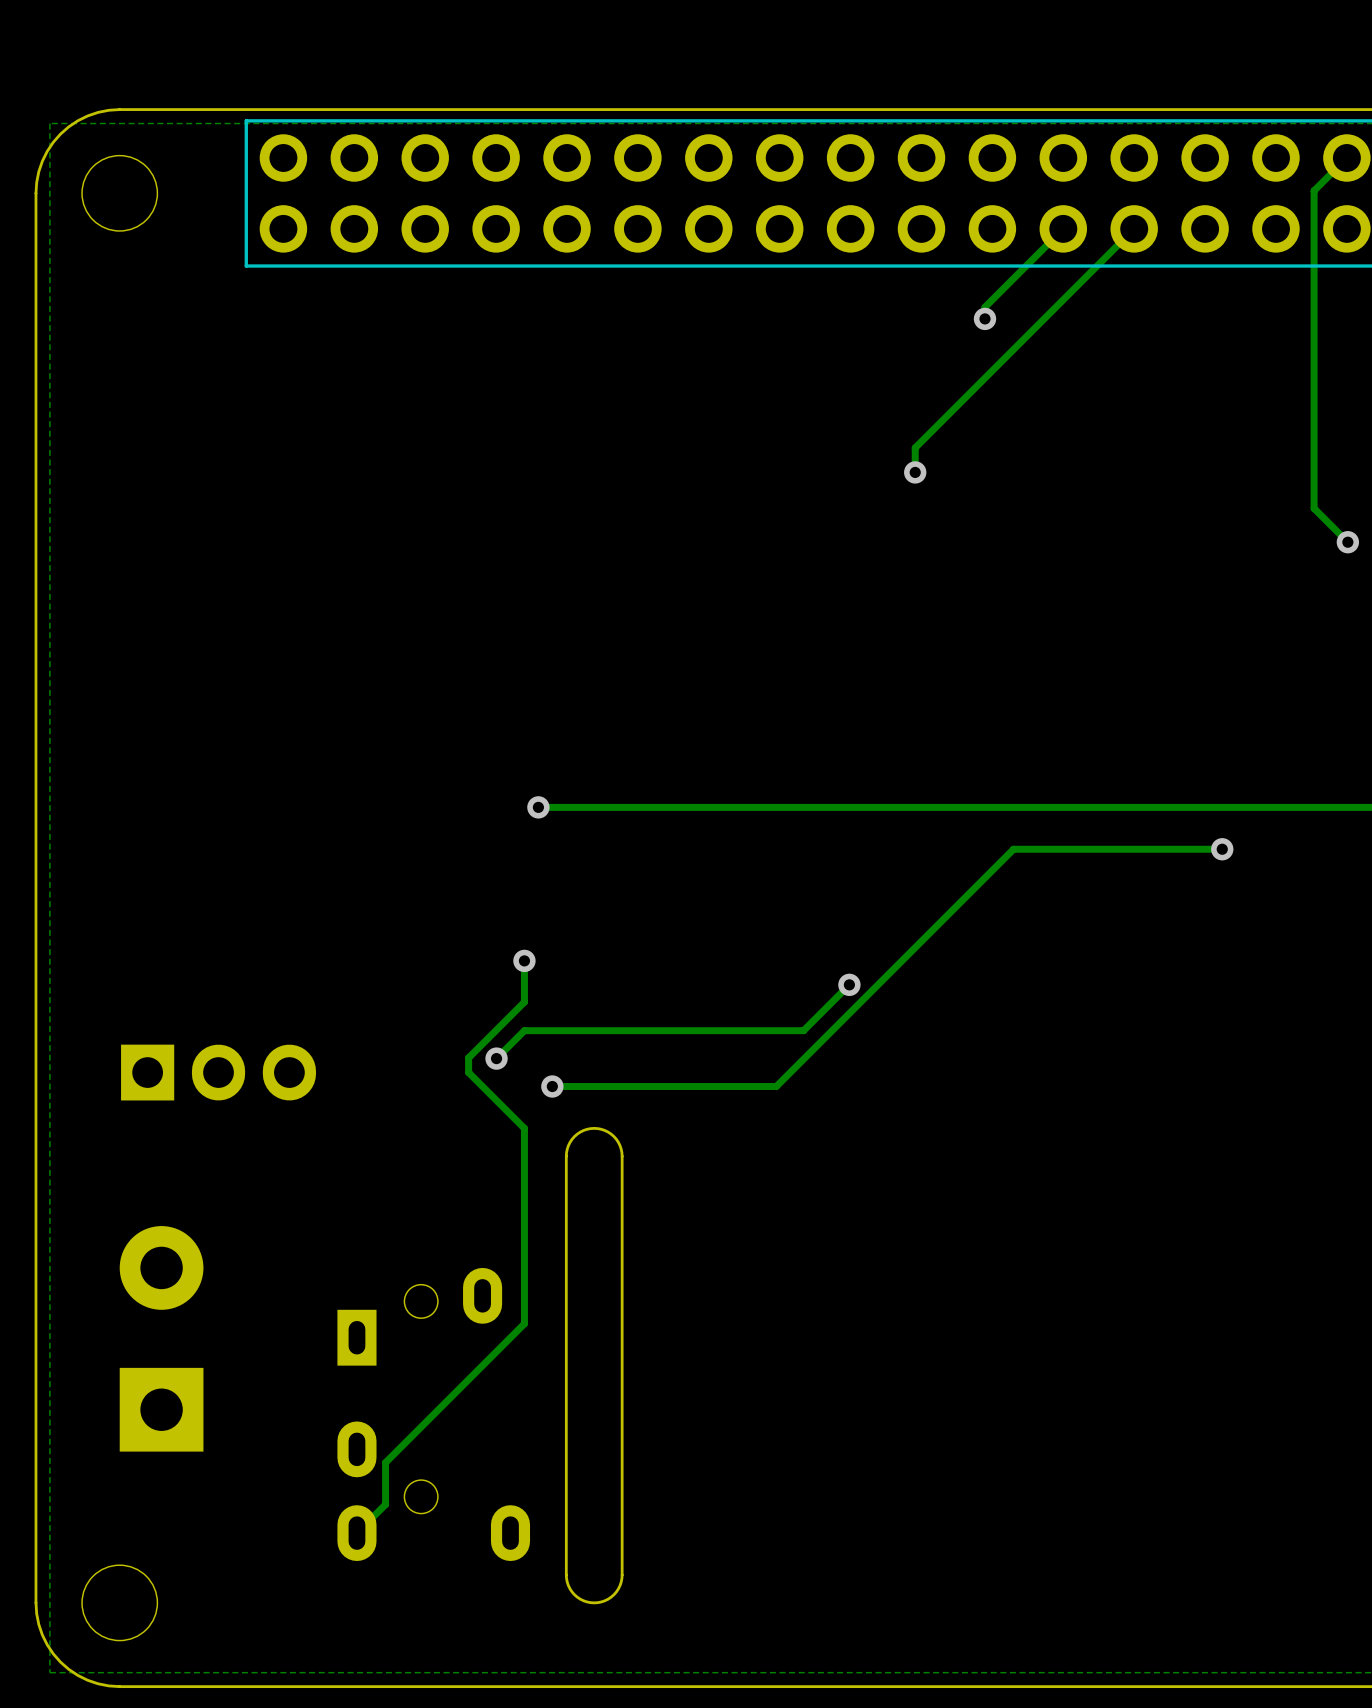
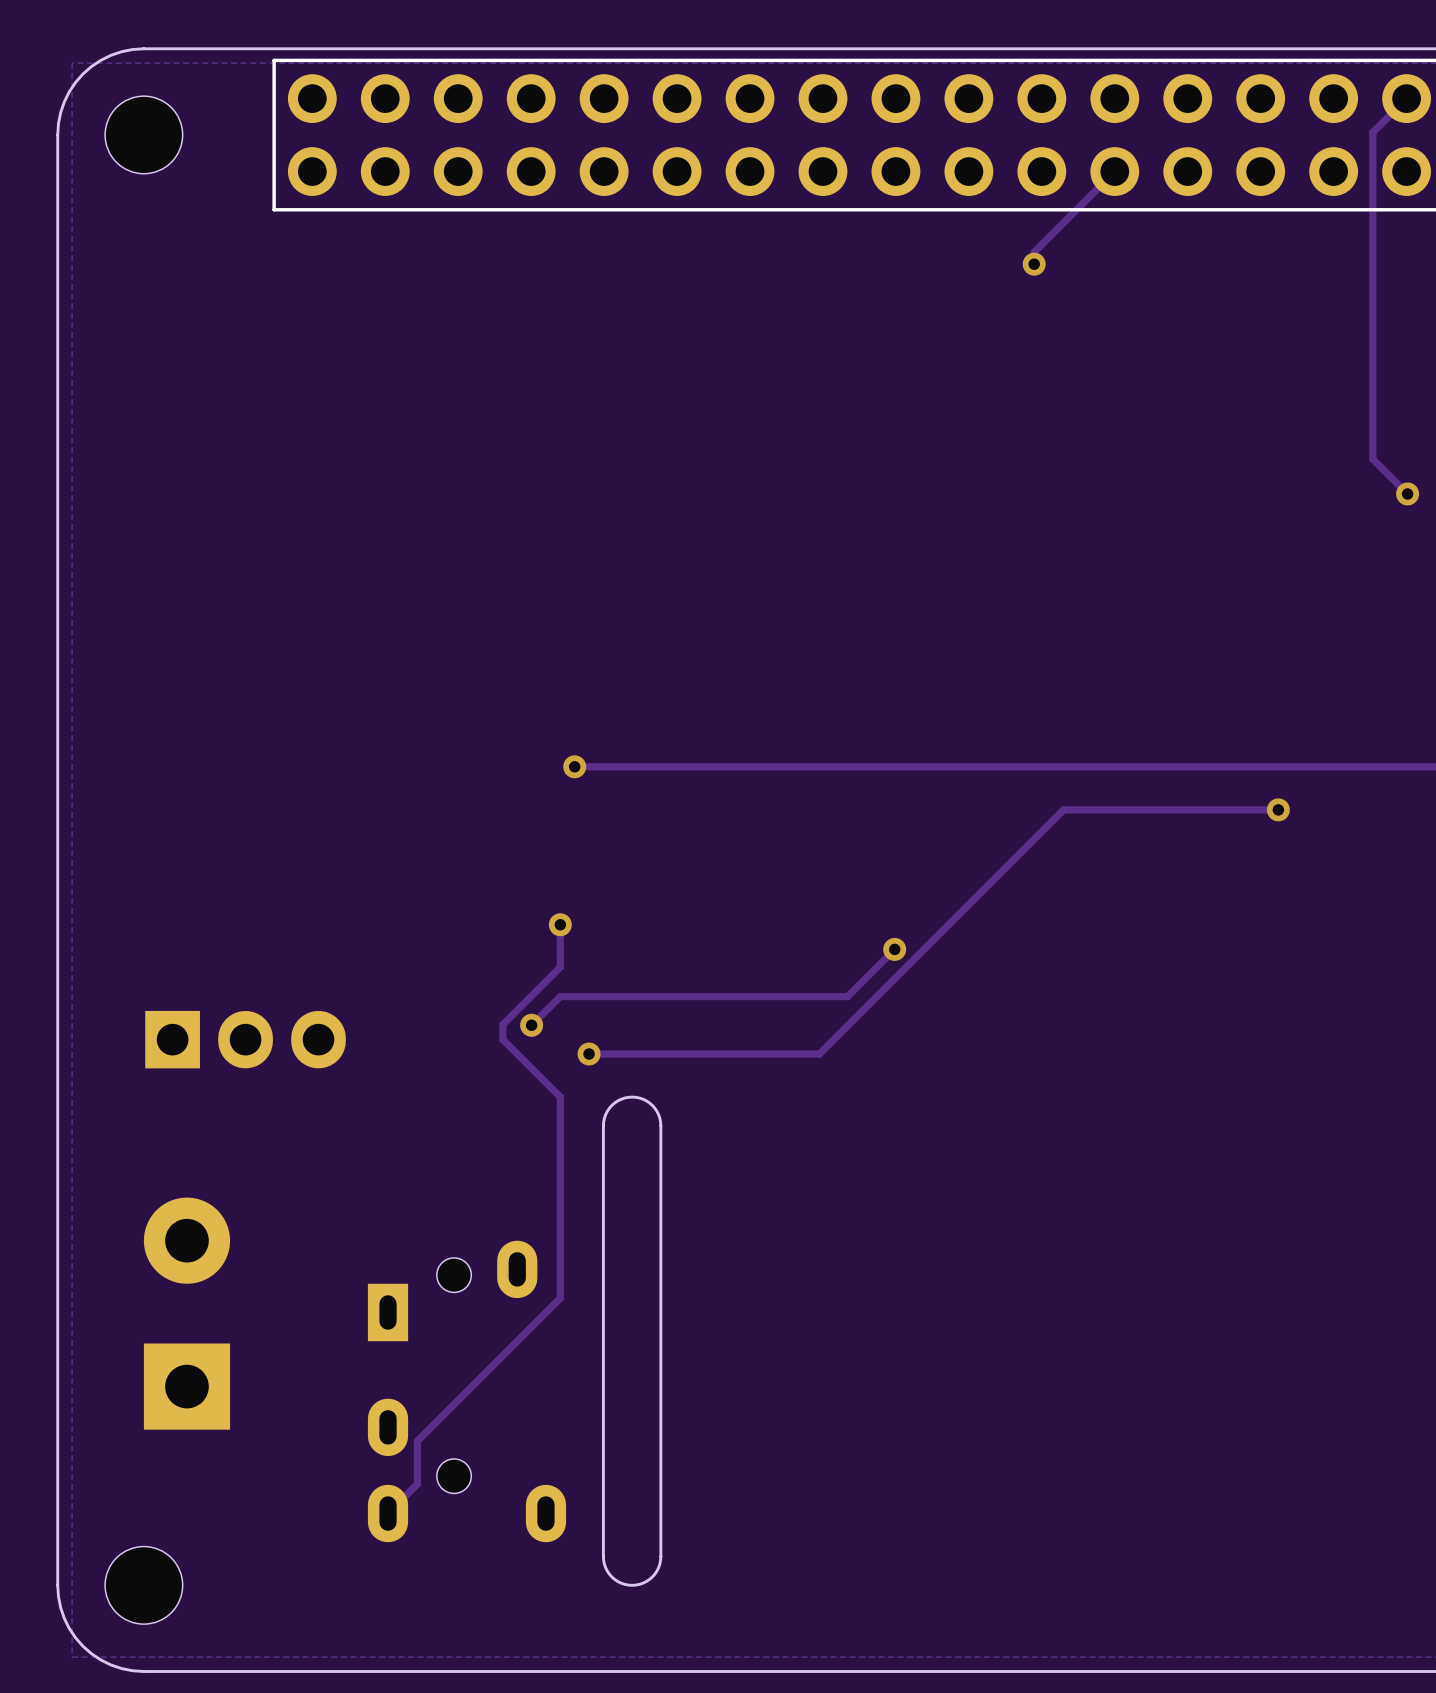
track: (1134, 228) (915, 447) (915, 472) -> none
via: (915, 472) -> none

